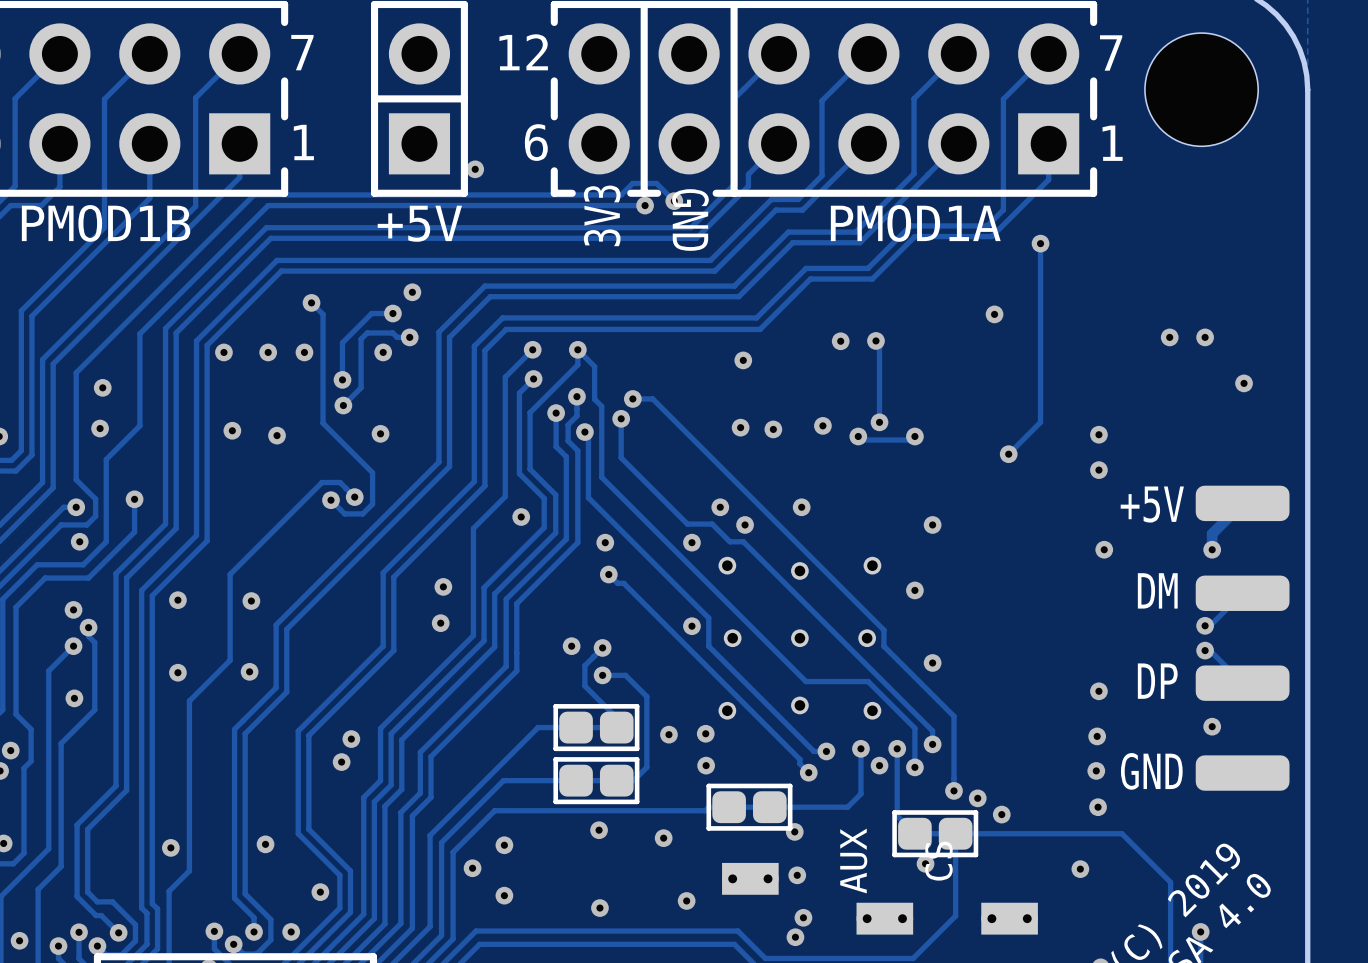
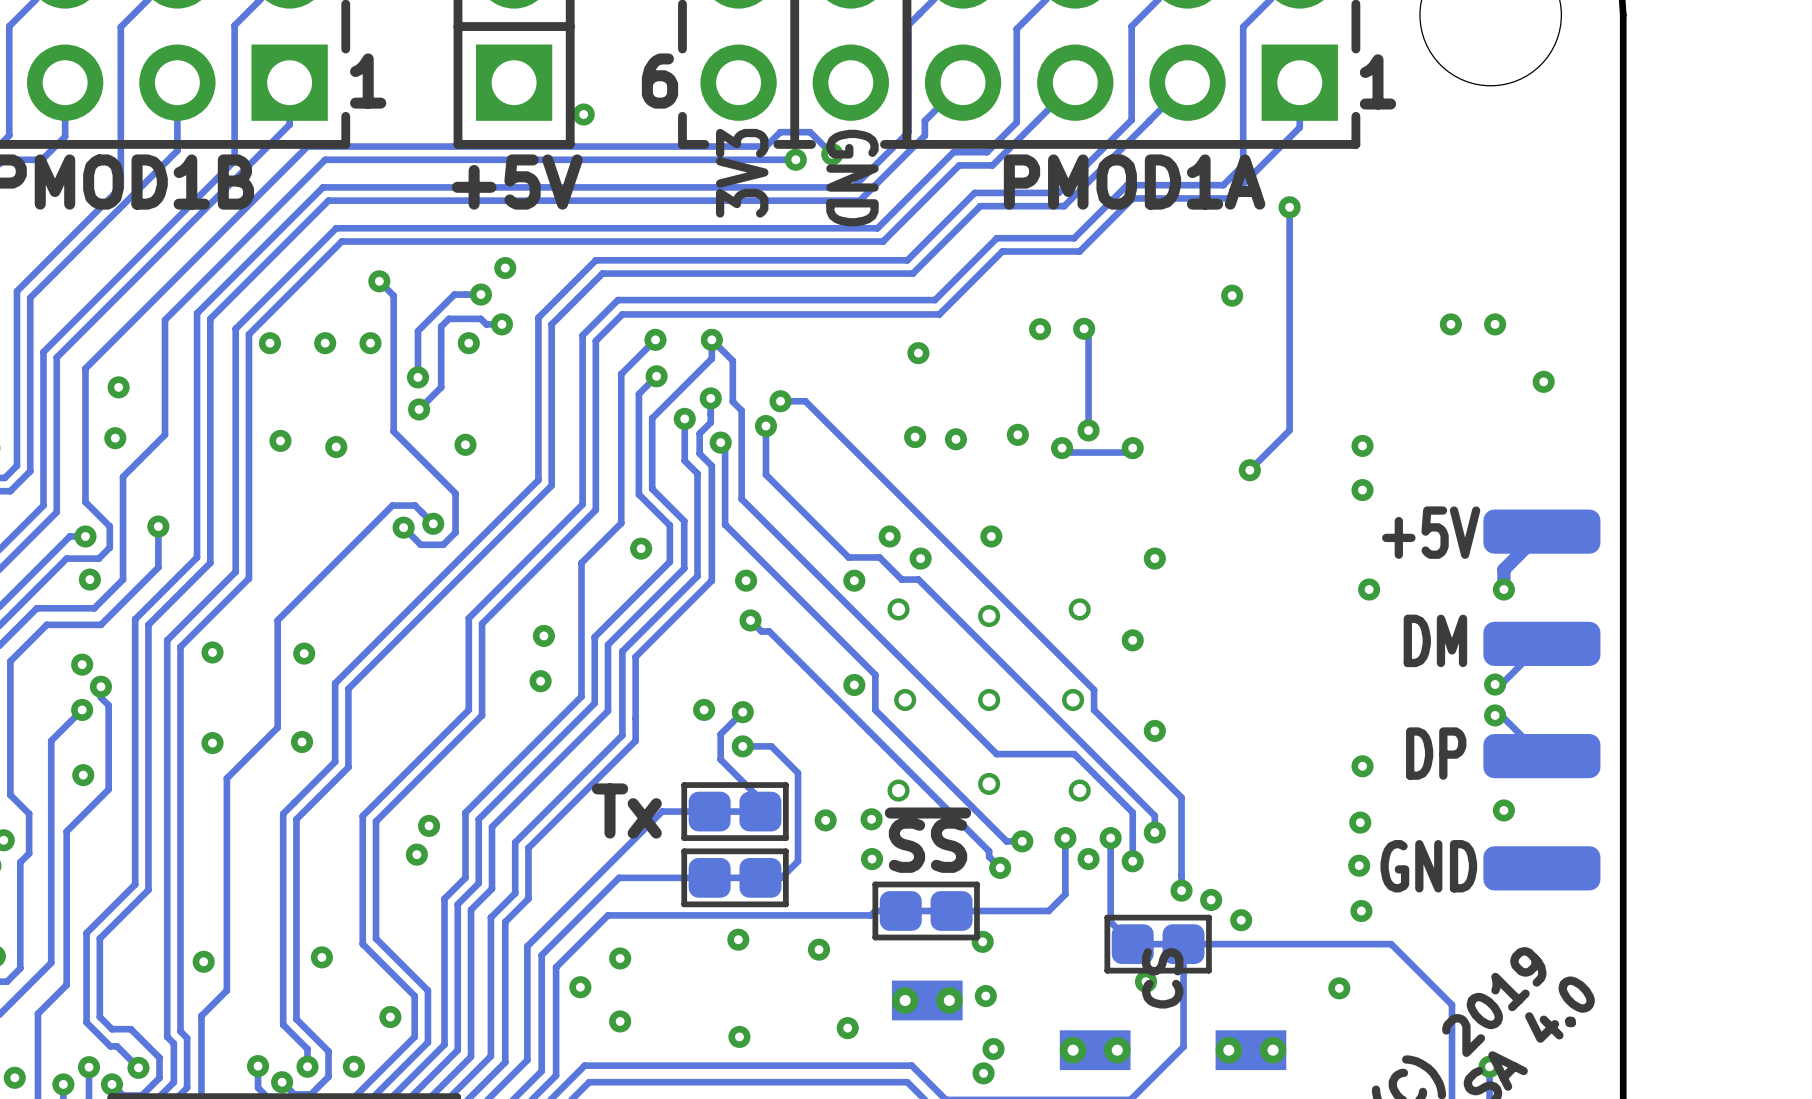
text: none -> Tx (626, 811)
text: none -> ~{SS} (928, 840)
text: AUX (853, 861) -> none

